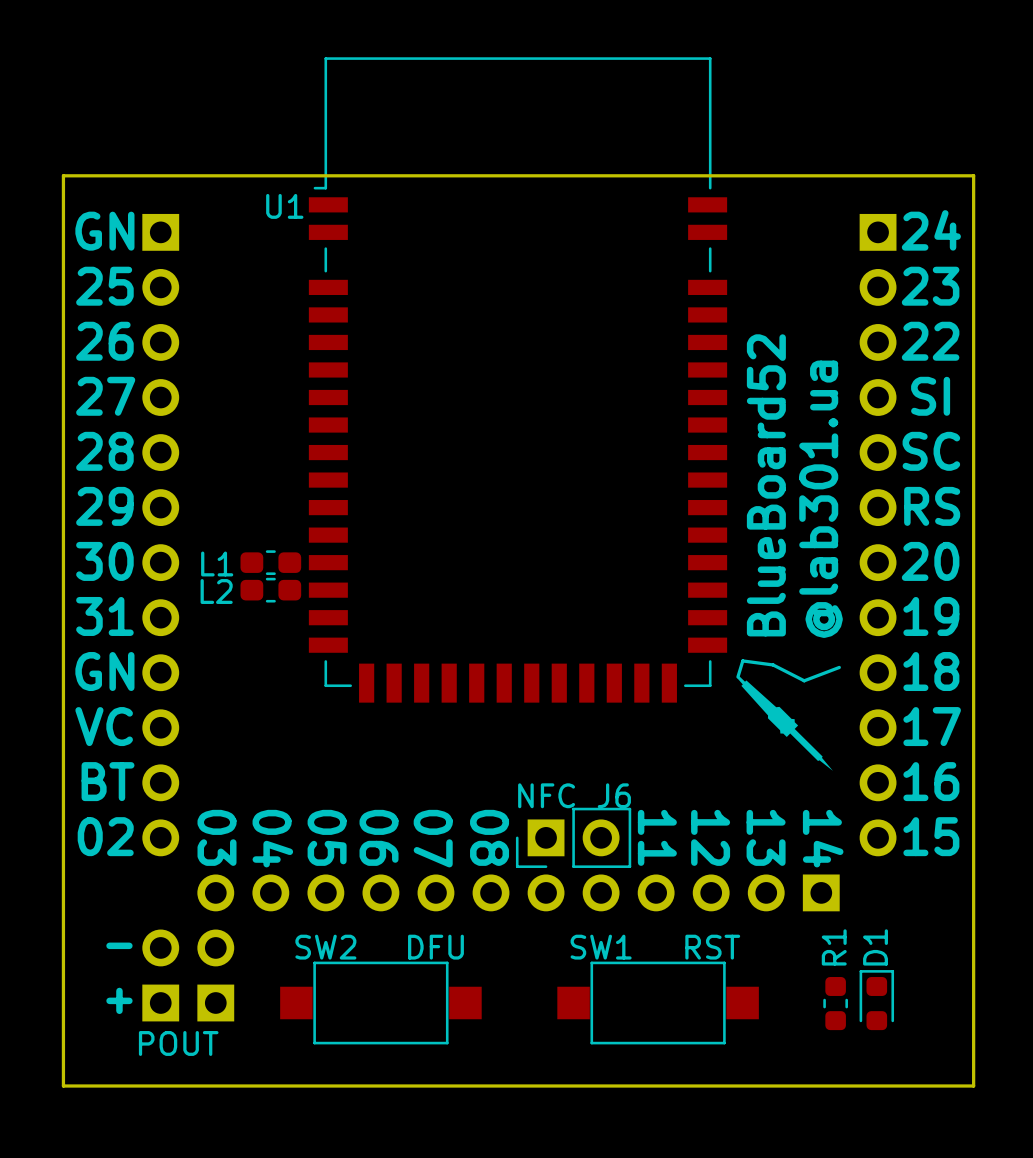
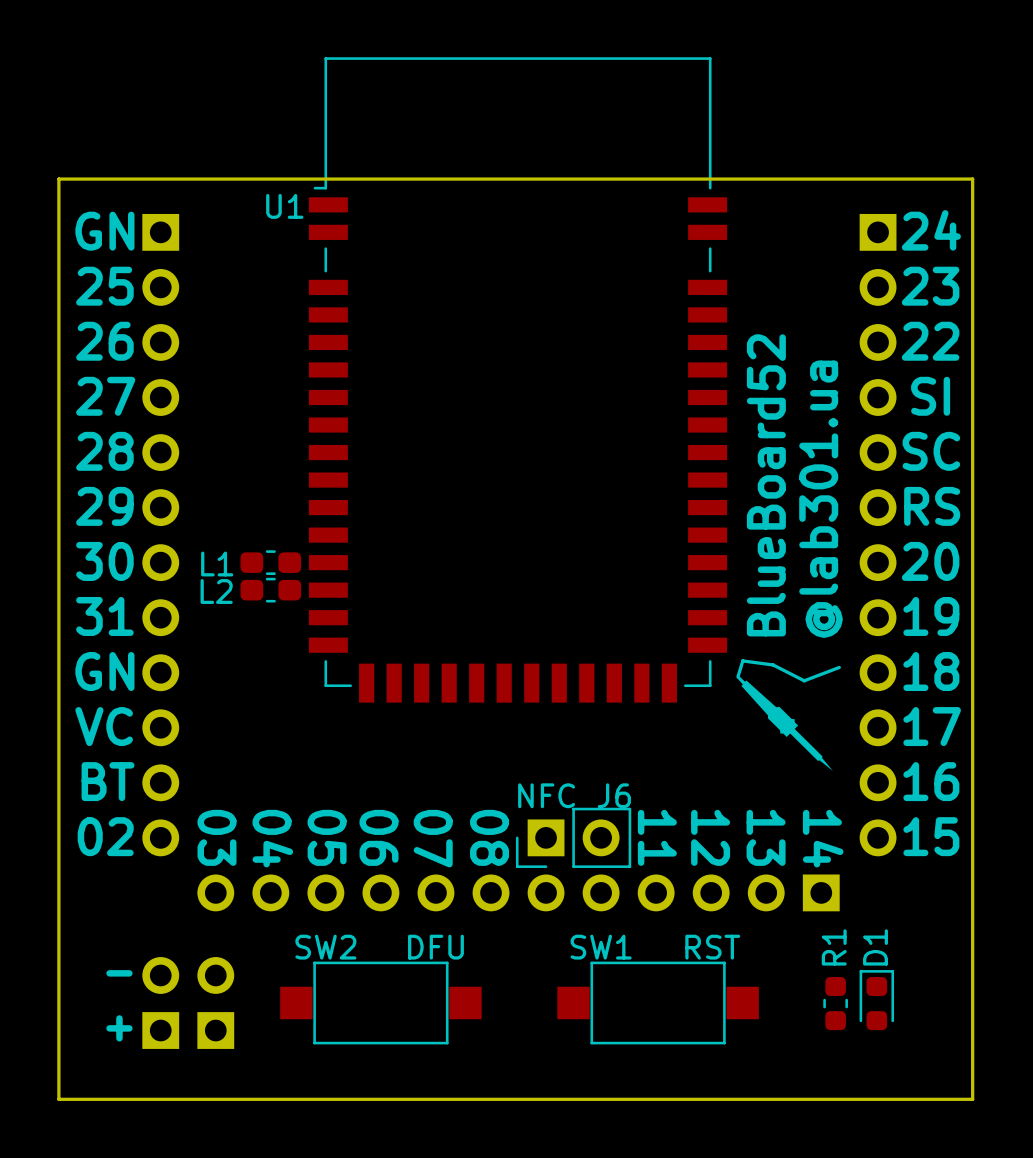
board edge: (63, 175) (63, 1086) (973, 1086) (973, 175) (63, 175) -> (58, 179) (58, 1099) (972, 1099) (972, 179) (58, 179)
text position: - (119, 945) -> - (119, 973)
part position: (160, 975) -> (160, 1003)
part position: (215, 975) -> (215, 1003)
text position: + (119, 1000) -> + (119, 1028)
text: POUT (178, 1043) -> none

